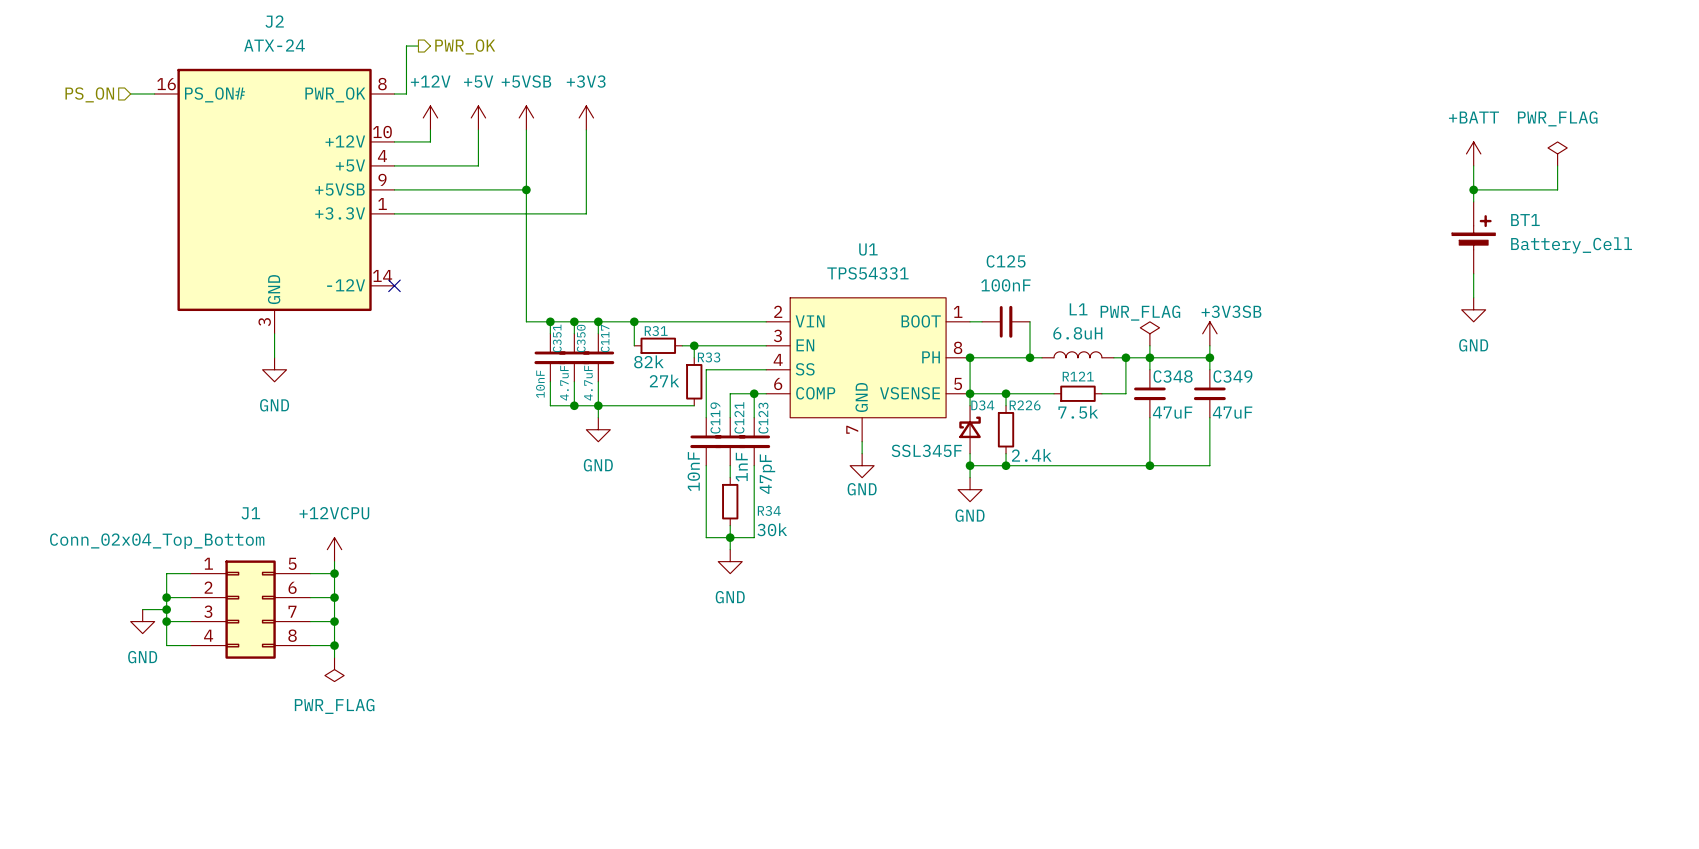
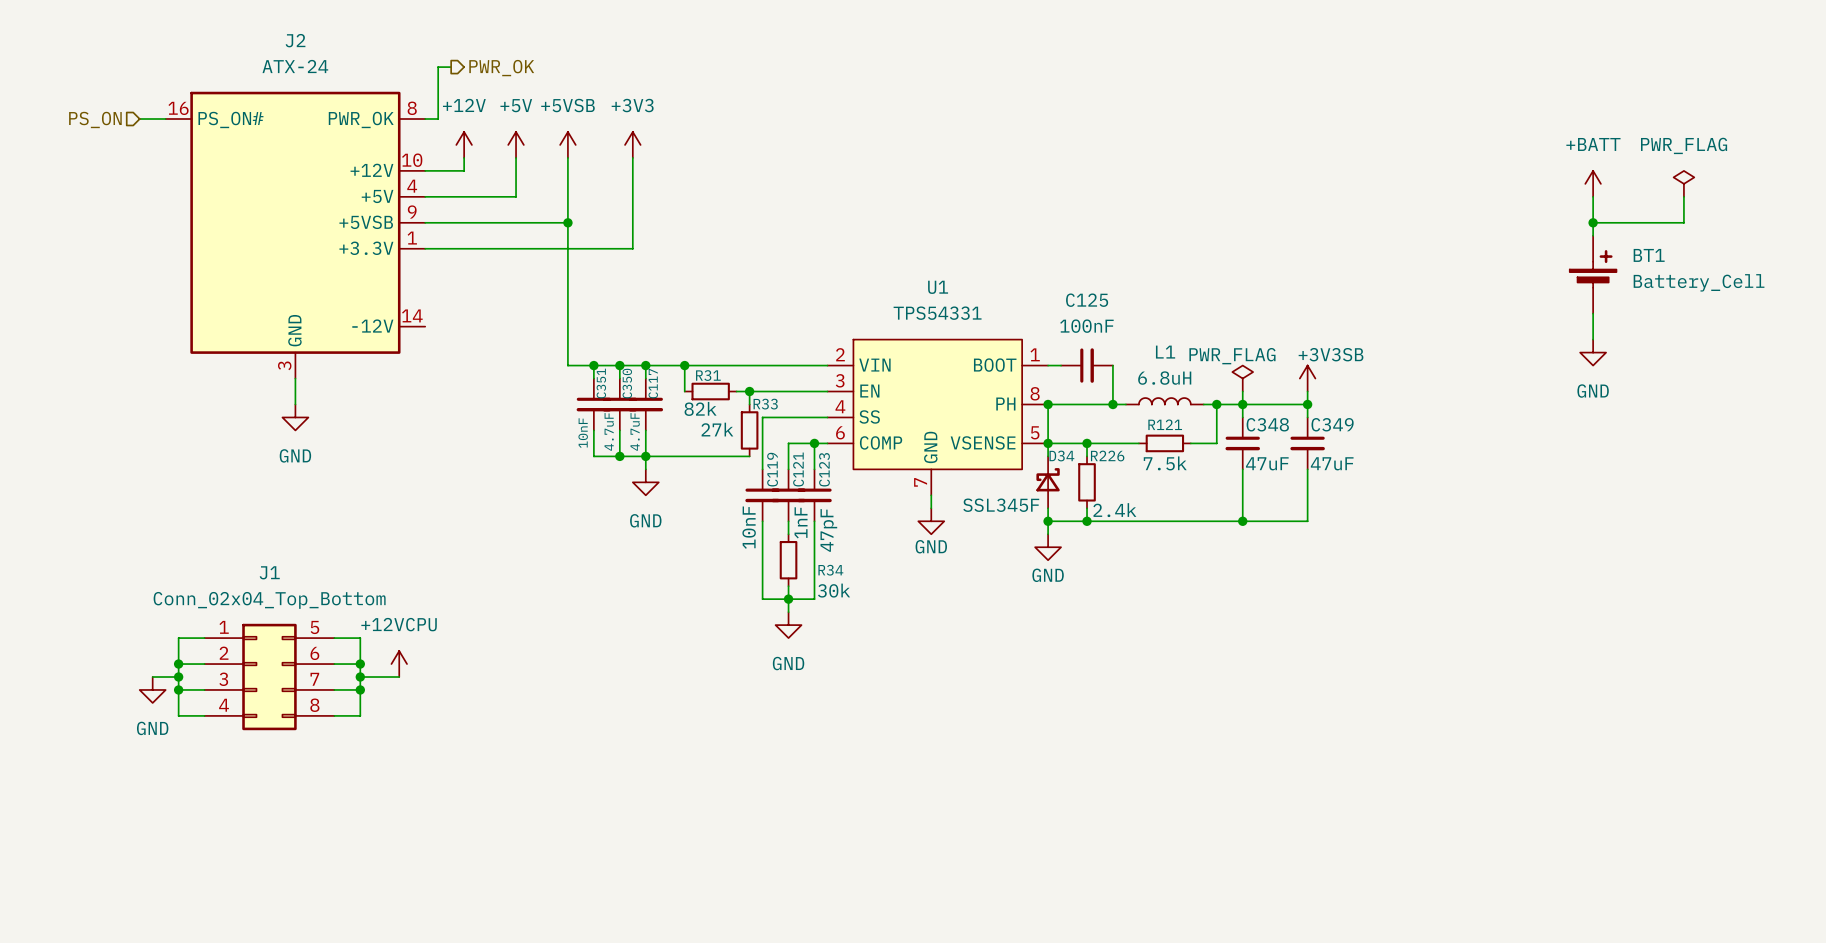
no-connect mark: (394, 285) -> none
J1 value position: Conn_02x04_Top_Bottom (157, 541) -> Conn_02x04_Top_Bottom (269, 600)
power symbol position: +12VCPU (334, 549) -> +12VCPU (399, 664)
wire: (334, 561) (334, 573) -> none
junction: (334, 573) -> none
wire: none -> (360, 677) (399, 677)
junction: none -> (360, 677)
wire: (334, 645) (334, 657) -> none
junction: (334, 645) -> none
power symbol: PWR_FLAG (334, 669) -> none

